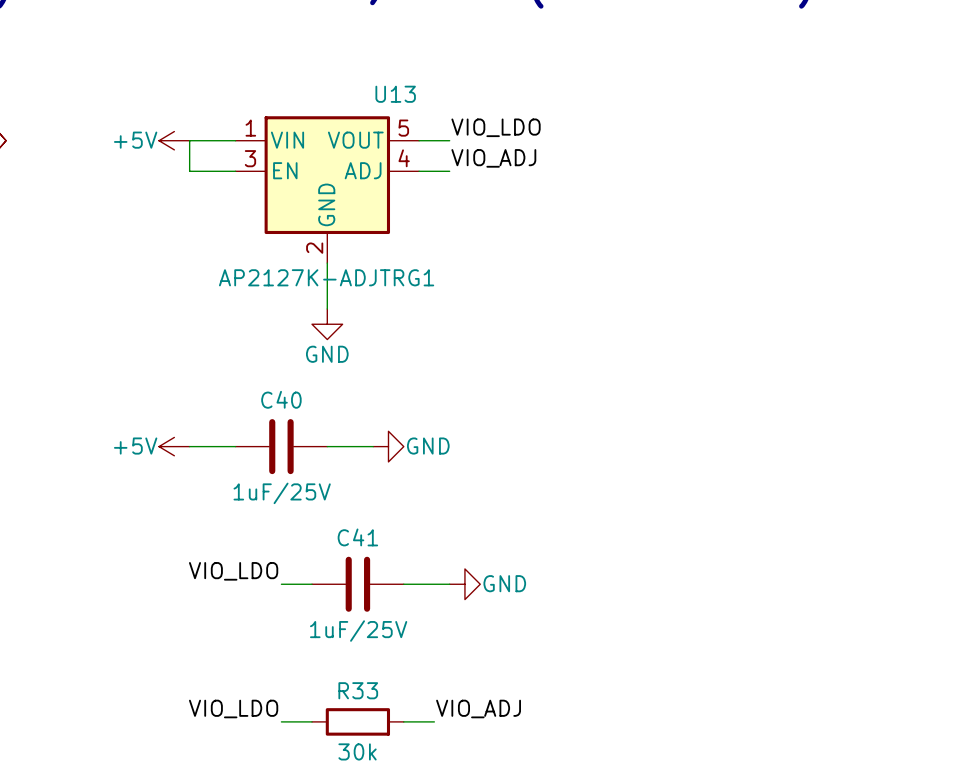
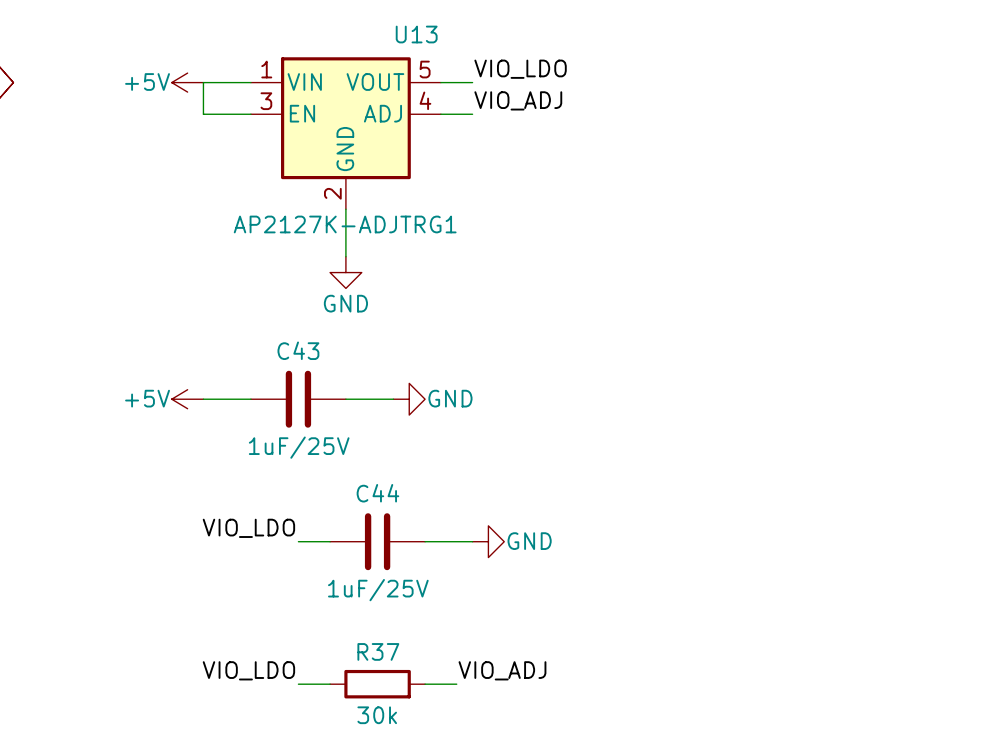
C40 name: C40 (281, 399) -> C43 (298, 350)
C41 name: C41 (357, 537) -> C44 (377, 493)
R33 name: R33 (358, 690) -> R37 (378, 651)

